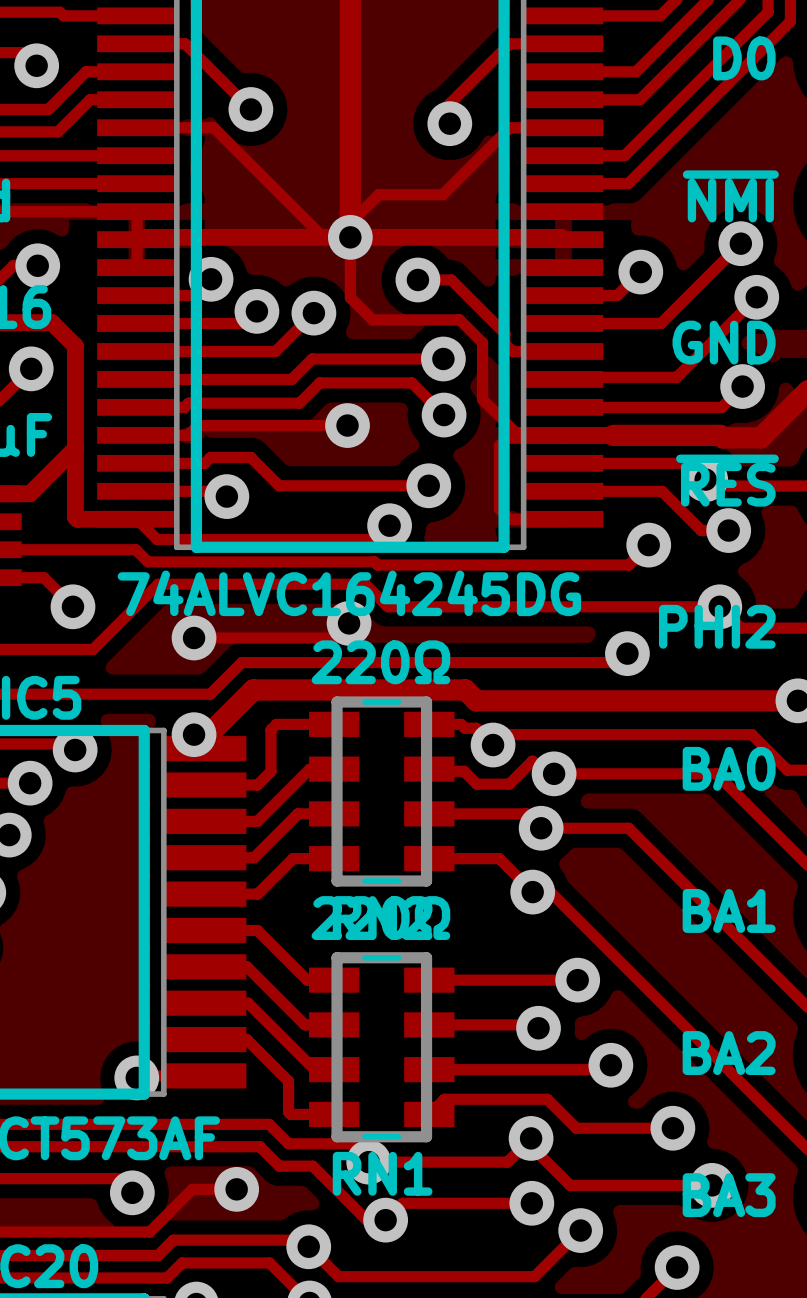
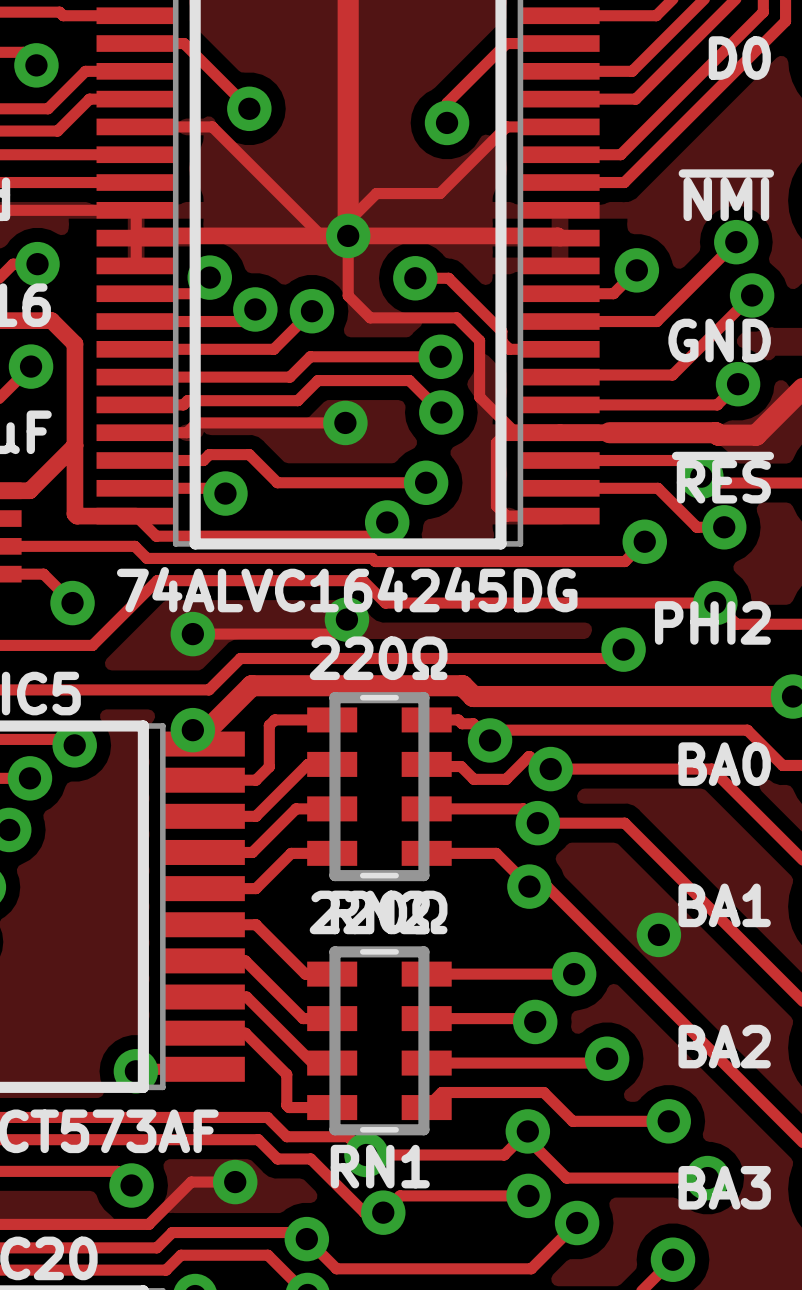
via: none -> (658, 934)

